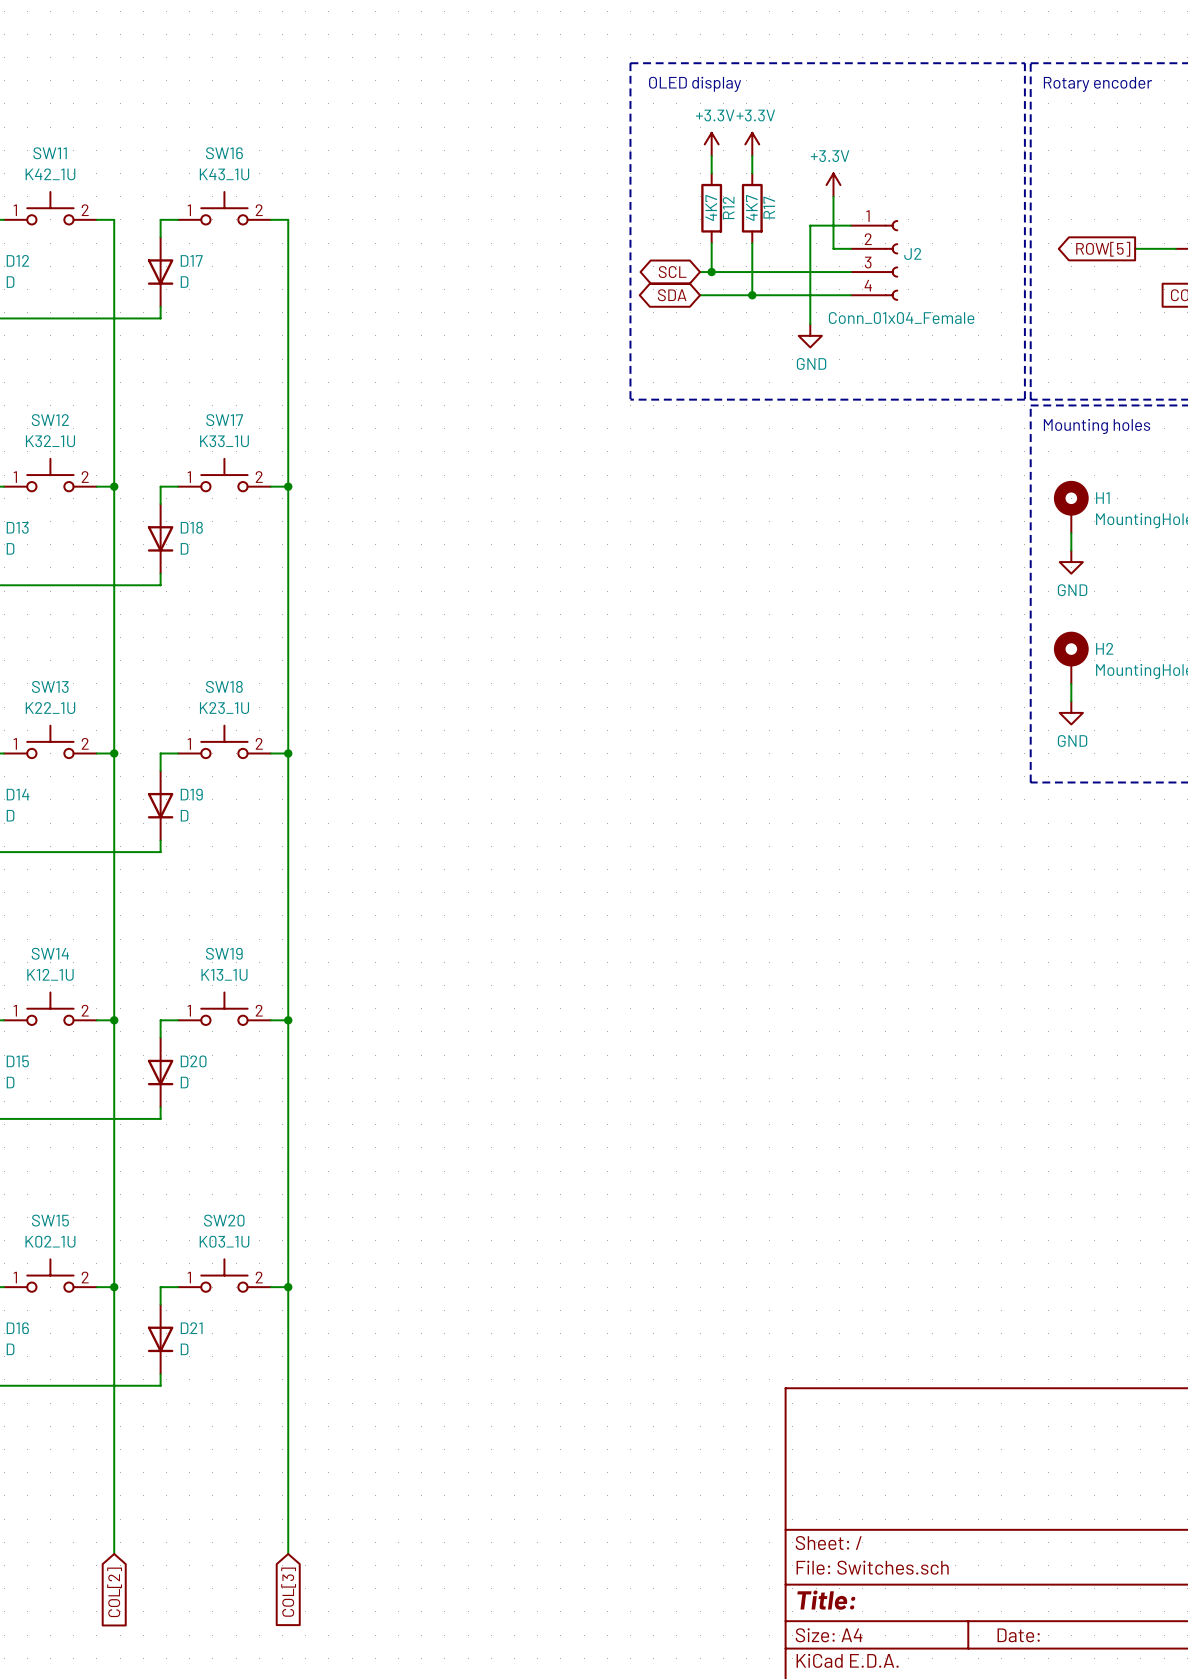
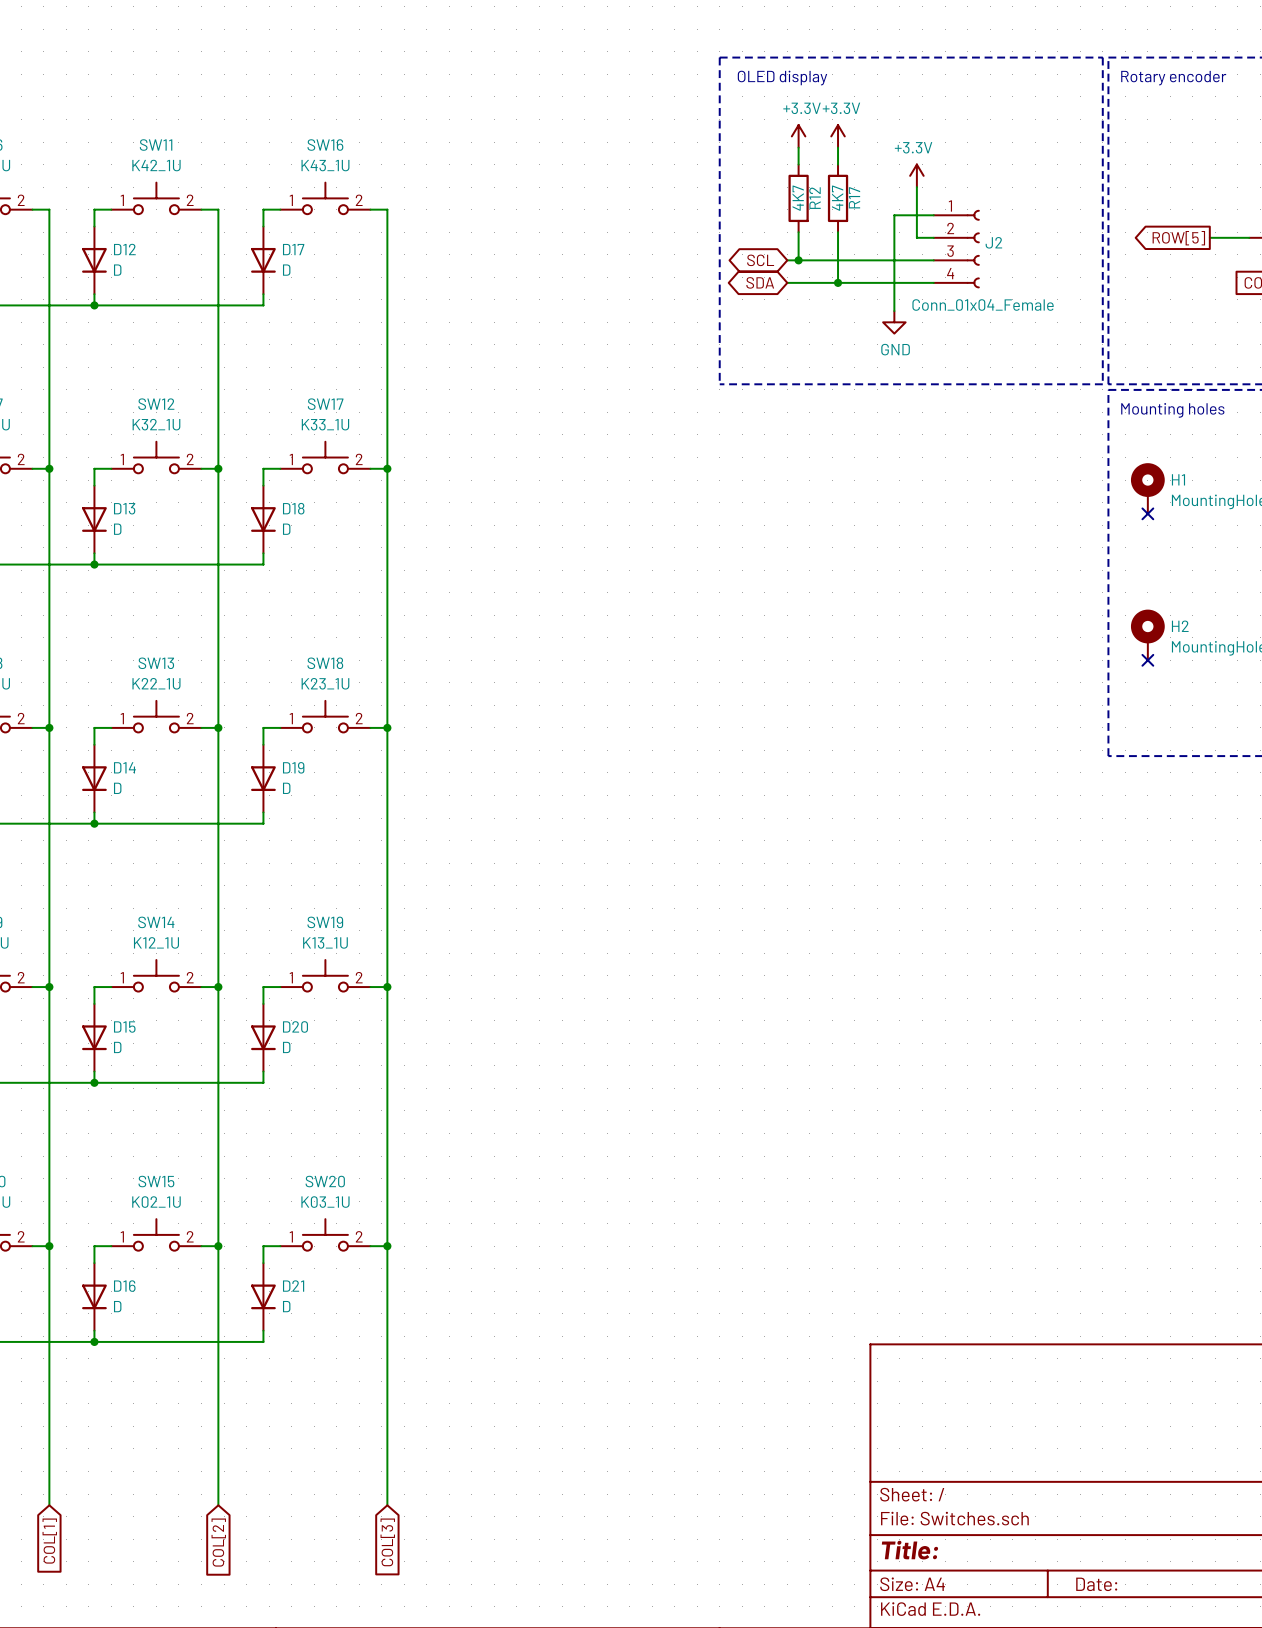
wire: (1071, 533) (1071, 550) -> none
no-connect mark: none -> (1147, 513)
power symbol: GND (1071, 562) -> none
wire: (1071, 683) (1071, 701) -> none
no-connect mark: none -> (1147, 660)
power symbol: GND (1071, 712) -> none

